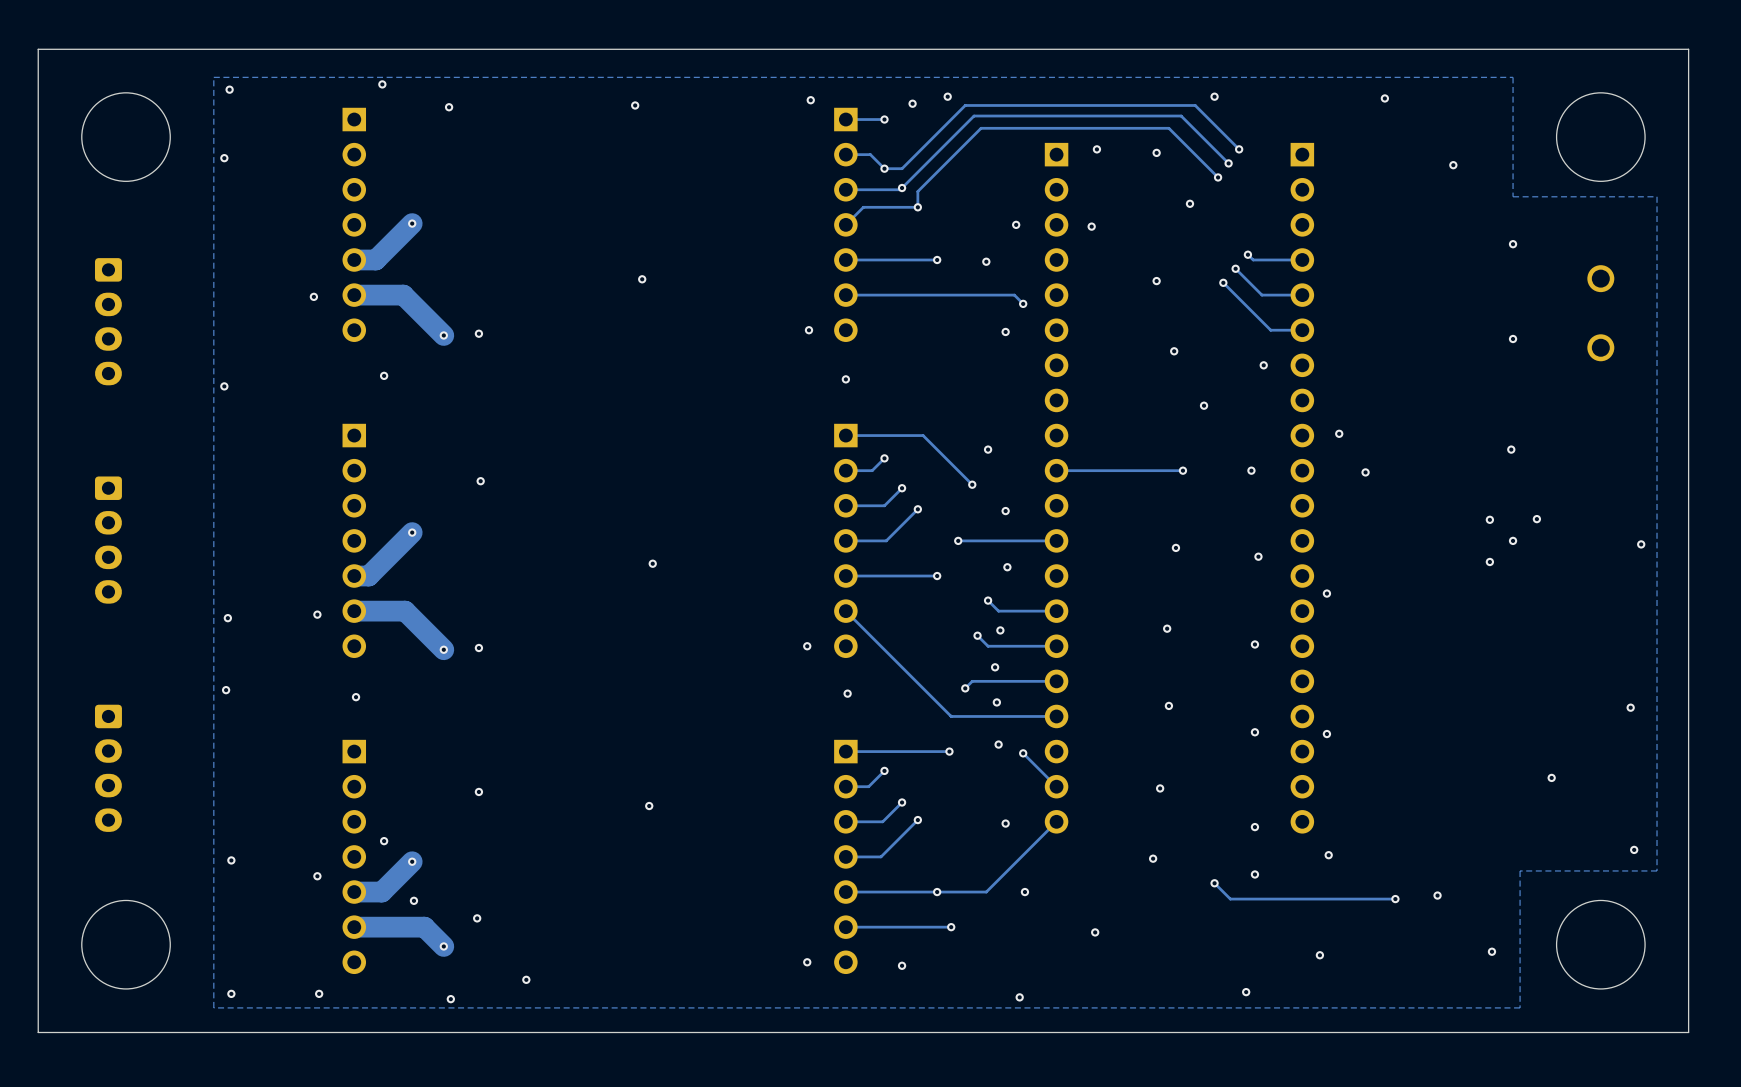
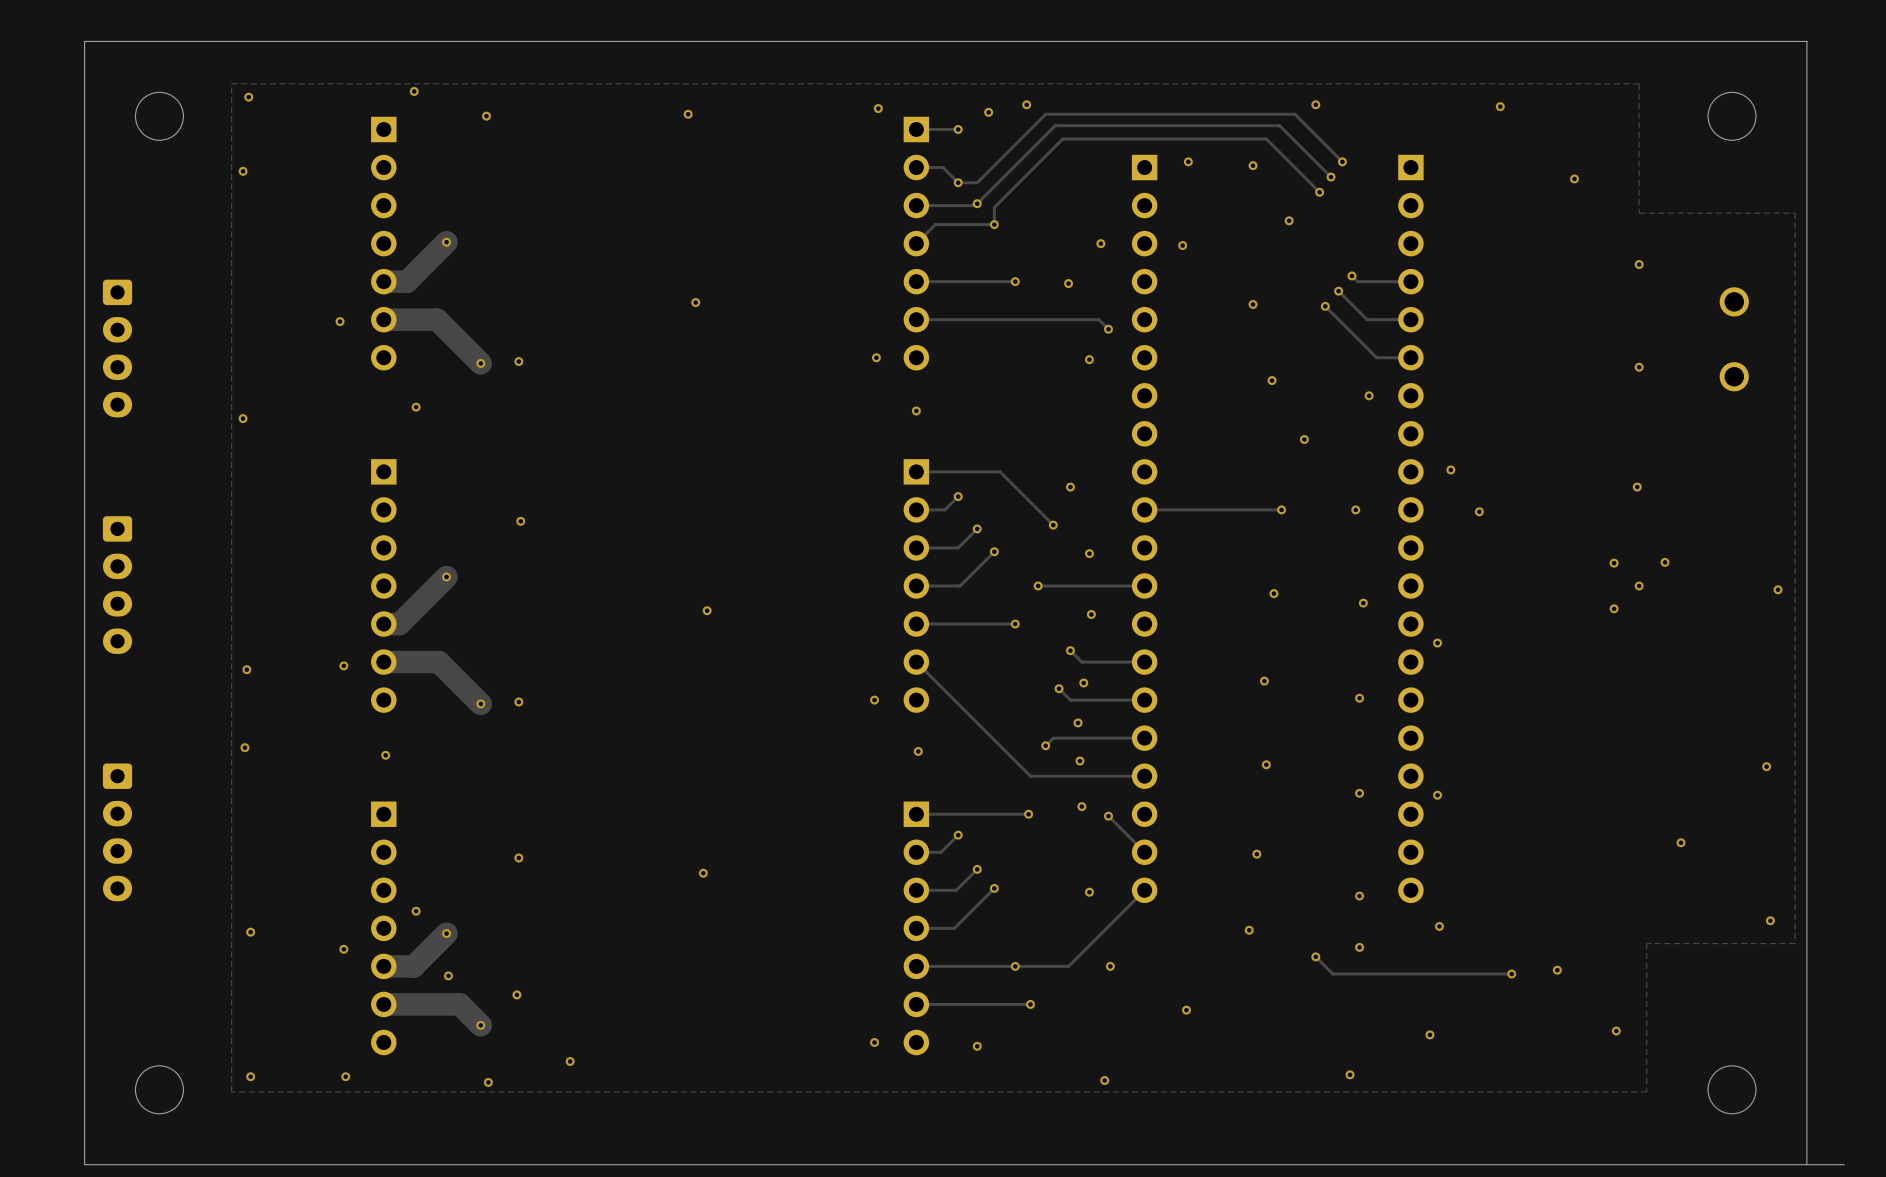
board edge: (1688, 49) (38, 49) (38, 1032) (1688, 1032) (1688, 49) -> none
round board edge: none -> [135, 91, 184, 141]
round board edge: none -> [1707, 91, 1757, 141]
round board edge: [81, 92, 171, 182] -> none
round board edge: [1556, 92, 1646, 182] -> none
round board edge: [81, 900, 171, 990] -> none
round board edge: [1556, 900, 1646, 990] -> none
round board edge: none -> [135, 1065, 184, 1115]
round board edge: none -> [1707, 1065, 1757, 1115]
board edge: none -> (1844, 1164) (84, 1164) (84, 41) (1806, 41) (1806, 1164)

